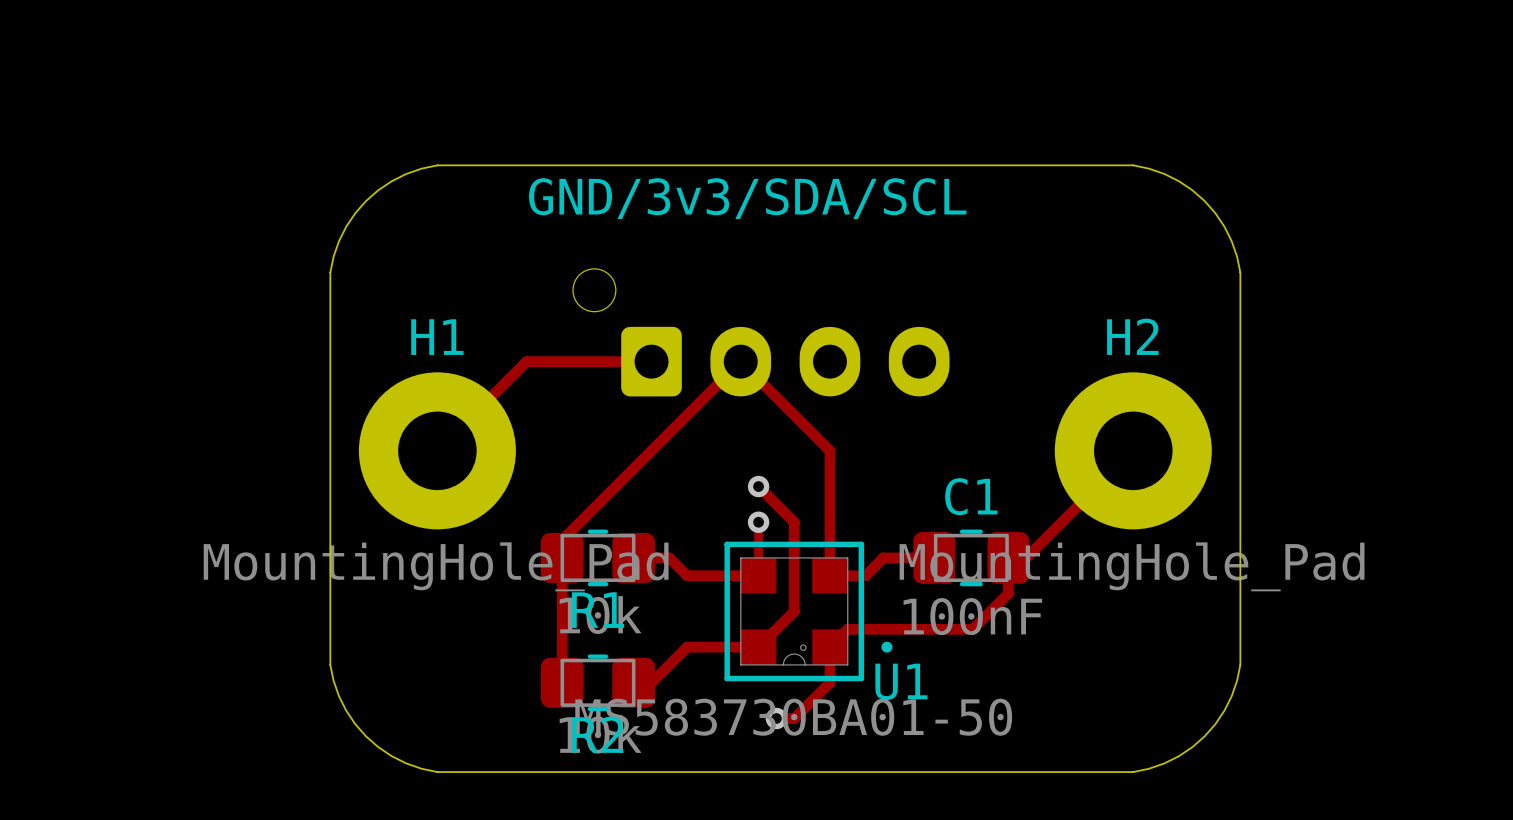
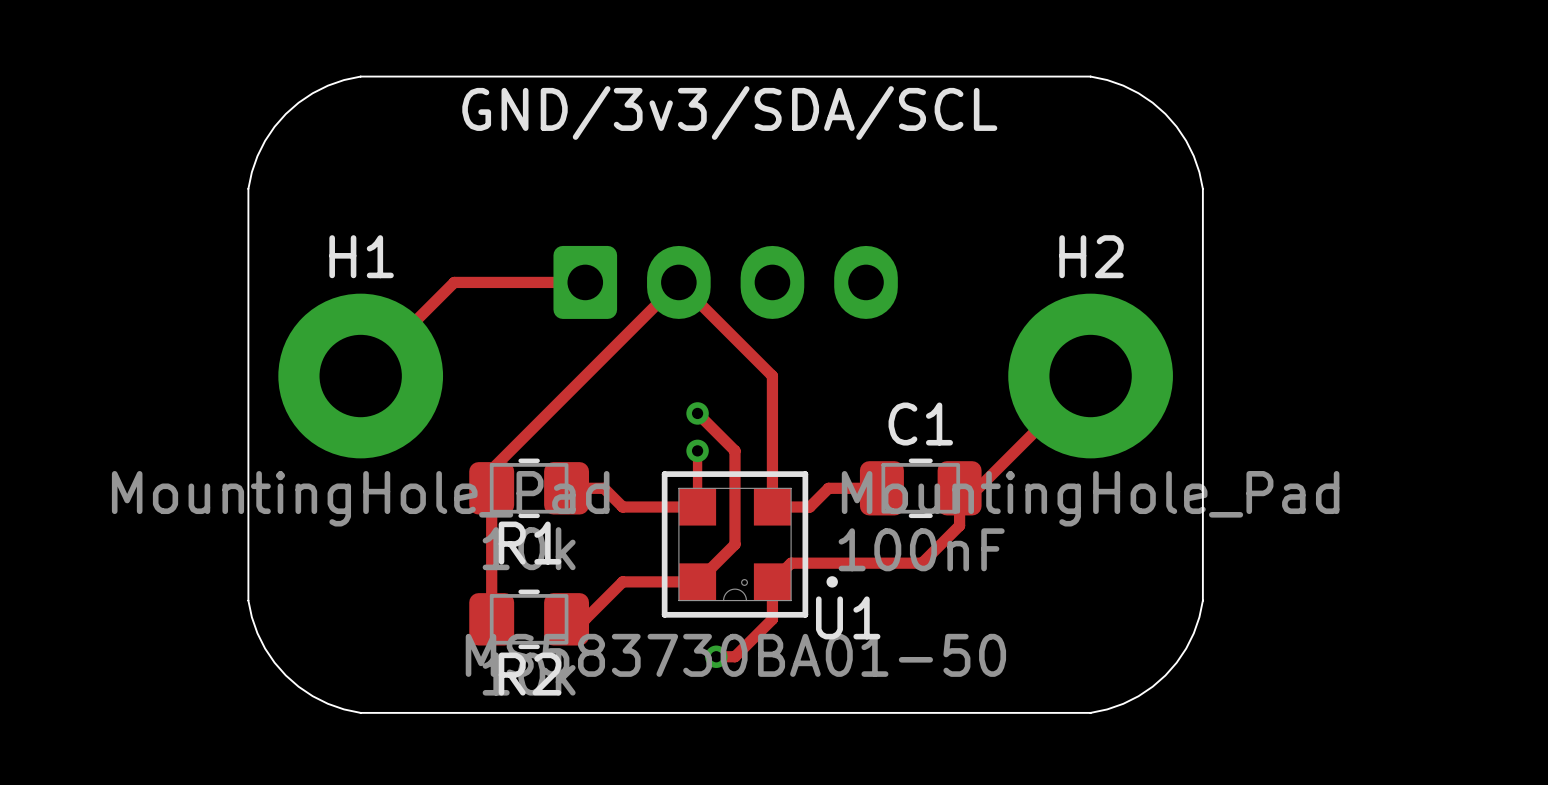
part: (761, 332) -> none

